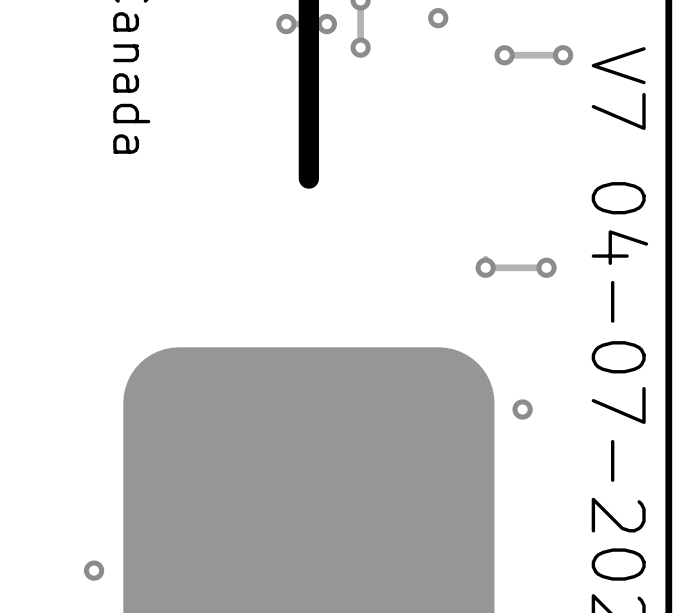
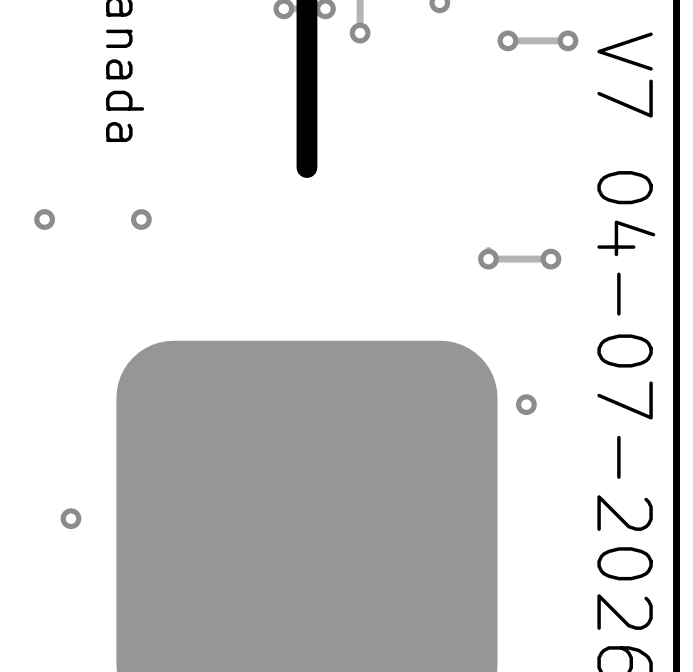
via: none -> (44, 219)
via: none -> (141, 219)
via position: (94, 570) -> (71, 518)

